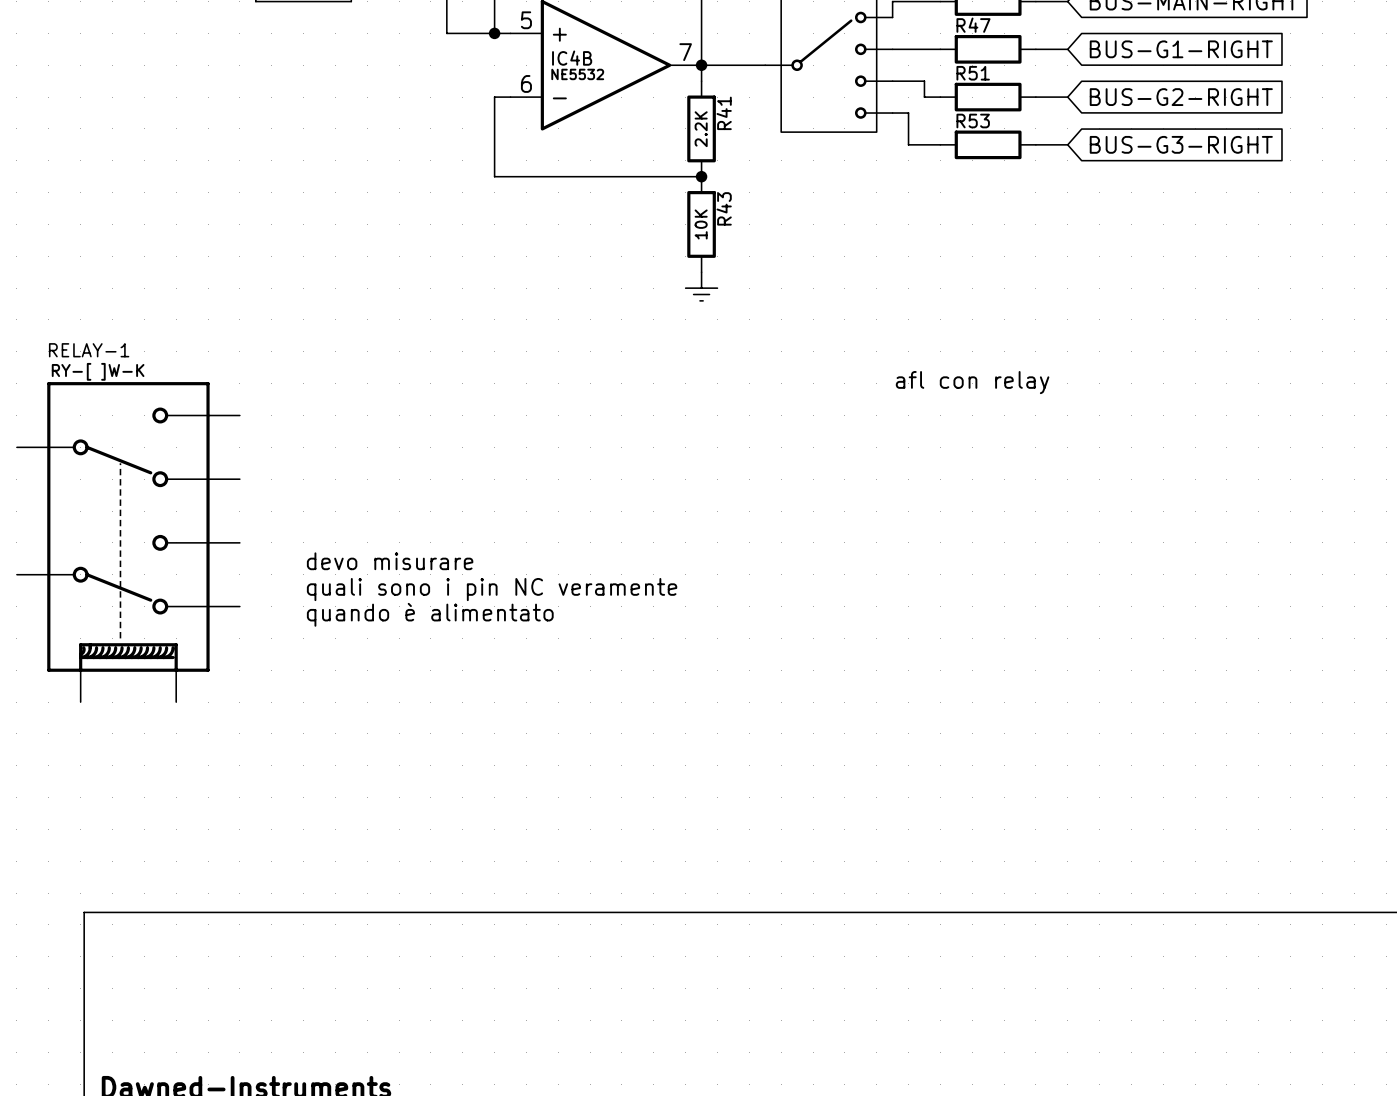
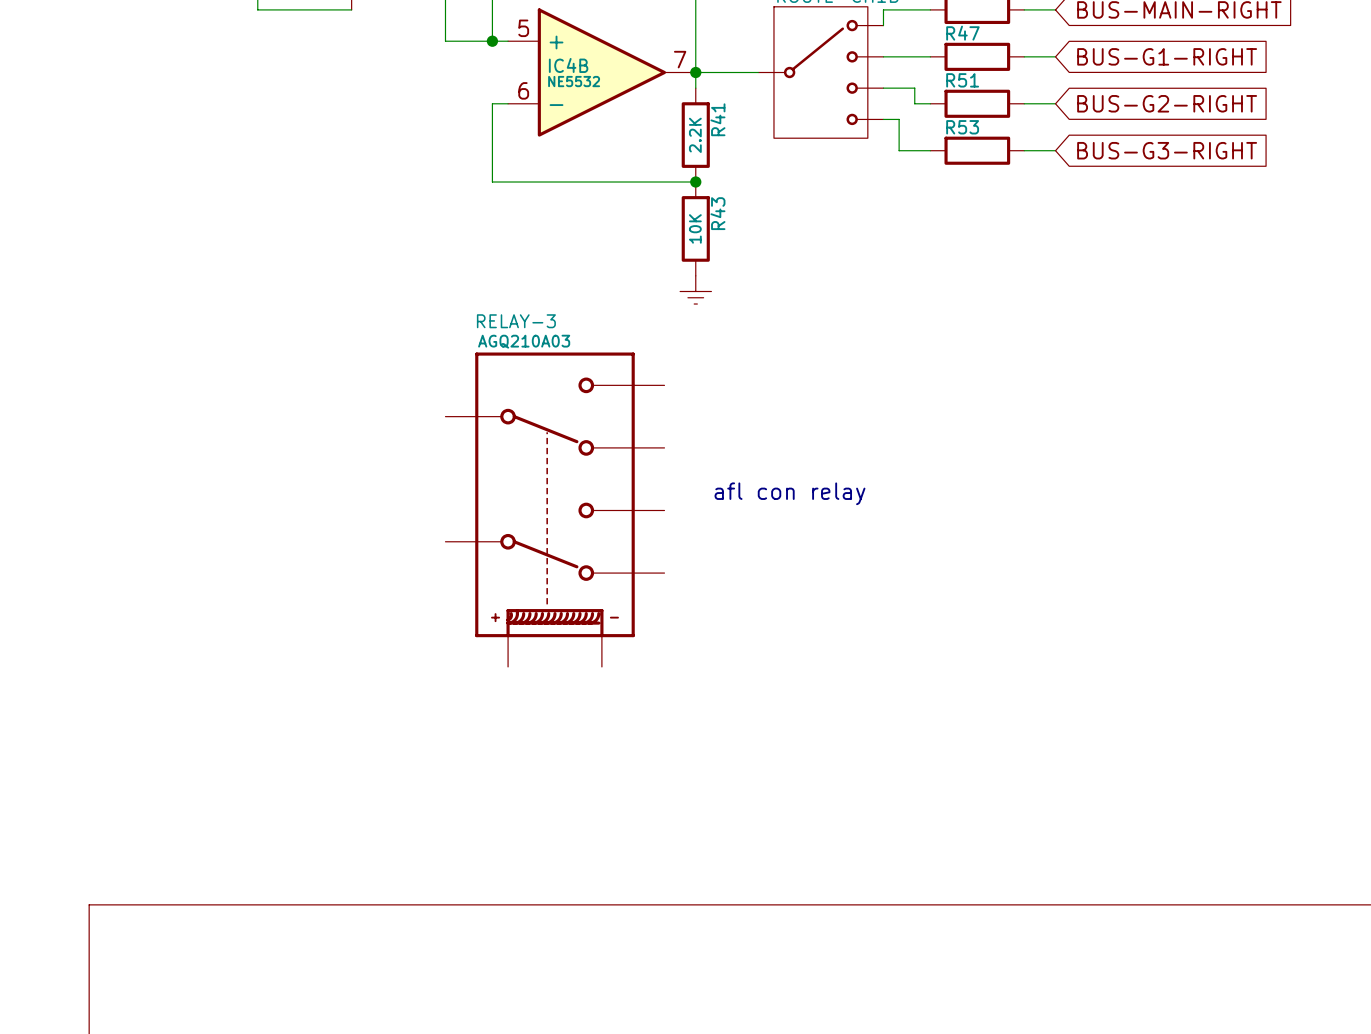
text position: afl con relay (972, 382) -> afl con relay (789, 493)
RELAY-3: none -> AGQ210A03 (554, 509)
RELAY-1: RY-[ ]W-K (128, 542) -> none
text: devo misurare (390, 561) -> none
text: quali sono i pin NC veramente (492, 589) -> none
text: quando è alimentato (430, 614) -> none

